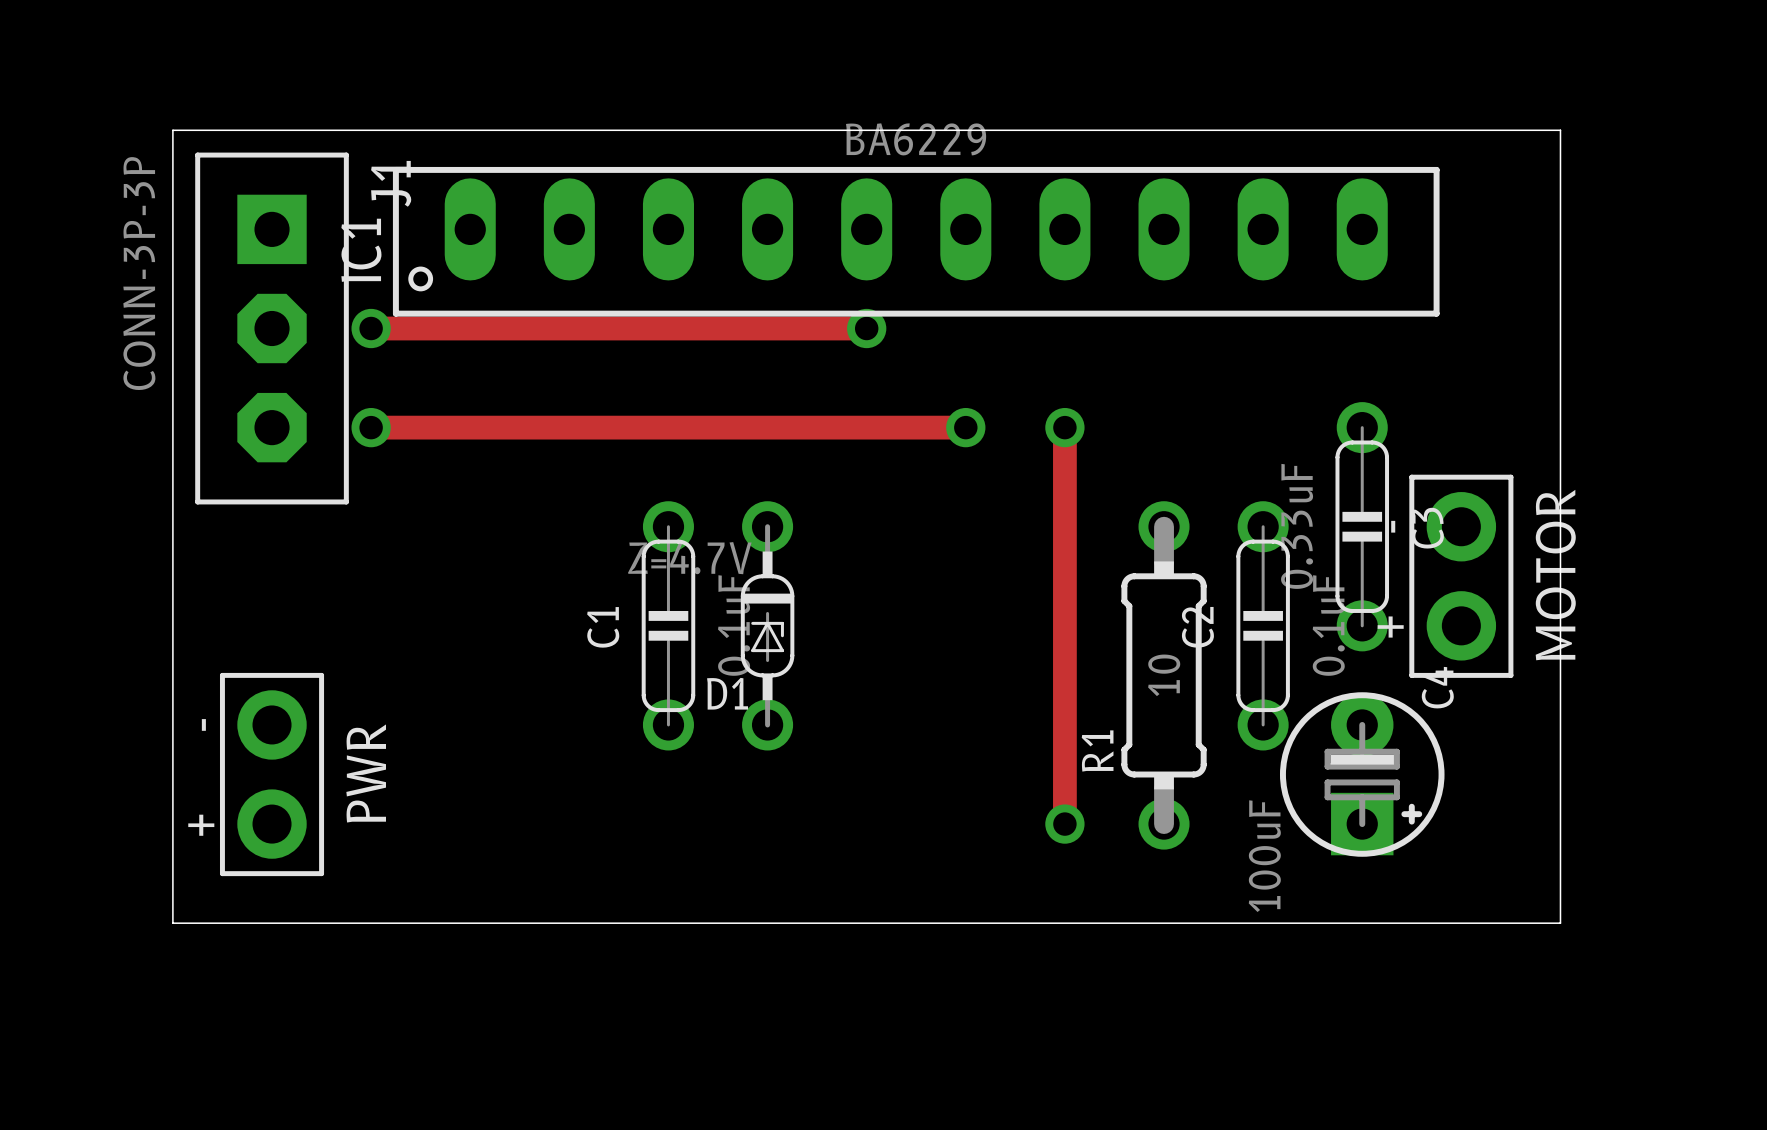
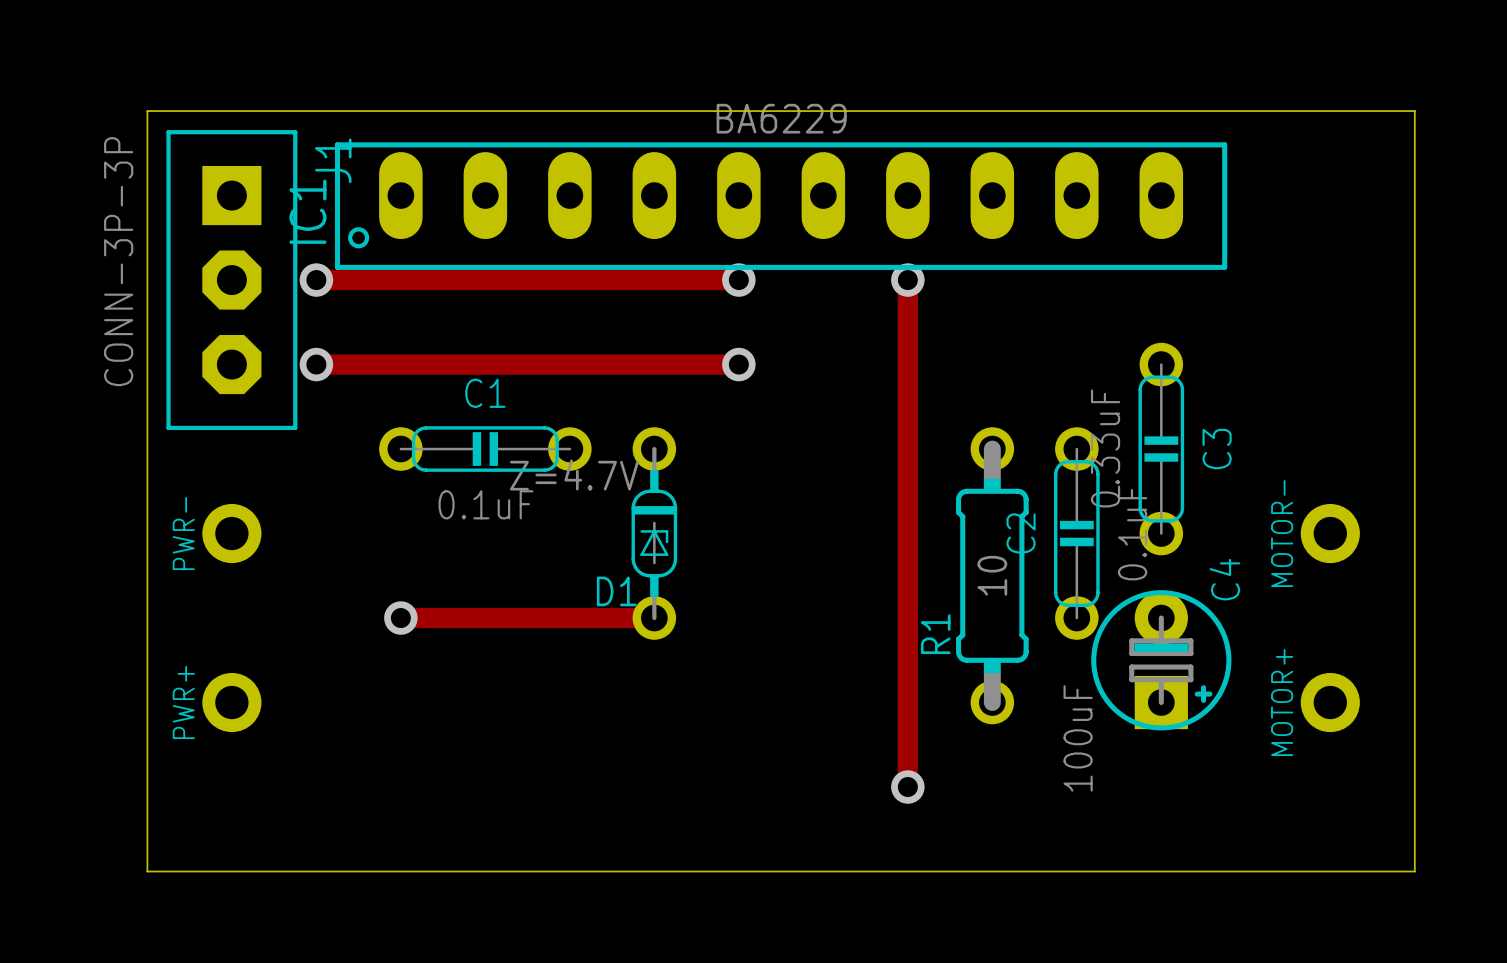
board edge: (1560, 130) (1560, 923) (172, 923) -> (1330, 111) (1414, 111) (1414, 871) (147, 871) (147, 787)
track: none -> (907, 280) (907, 364)
via: none -> (907, 280)
track: (866, 427) (965, 427) -> none
via: none -> (738, 364)
via: (965, 427) -> none
via: (1064, 427) -> none
MOTOR: (1461, 576) -> none
PWR-: none -> (231, 533)
C1 rotation: 0° (668, 625) -> 90° clockwise (485, 449)
MOTOR-: none -> (1330, 533)
track: none -> (400, 618) (654, 618)
via: none -> (400, 618)
PWR: (272, 774) -> none
PWR+: none -> (231, 702)
track: none -> (907, 702) (907, 787)
via position: (1064, 824) -> (907, 787)
MOTOR+: none -> (1330, 702)

